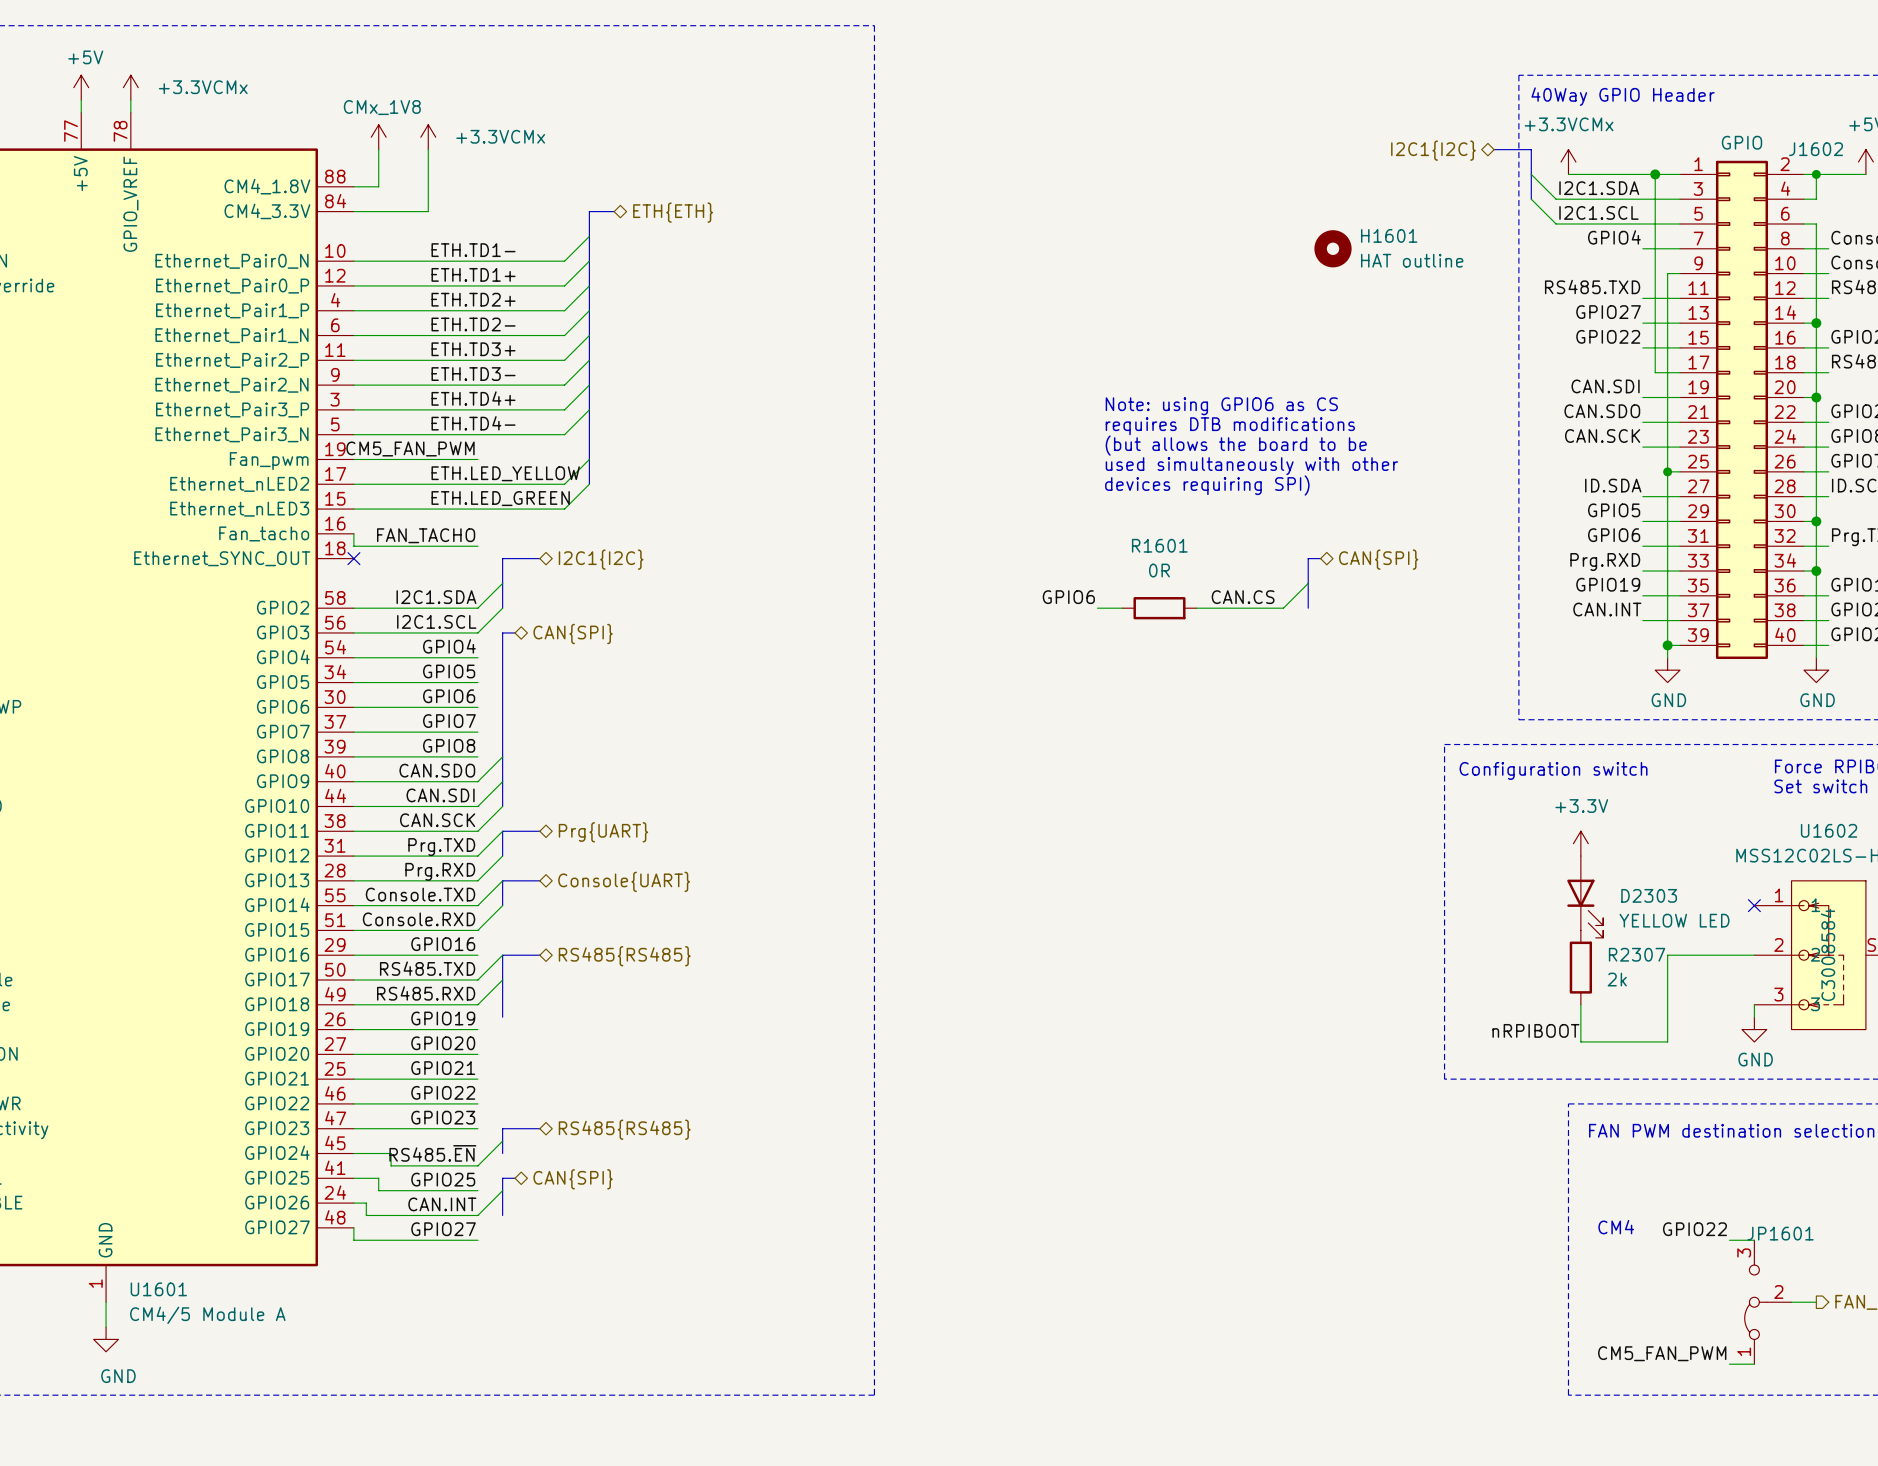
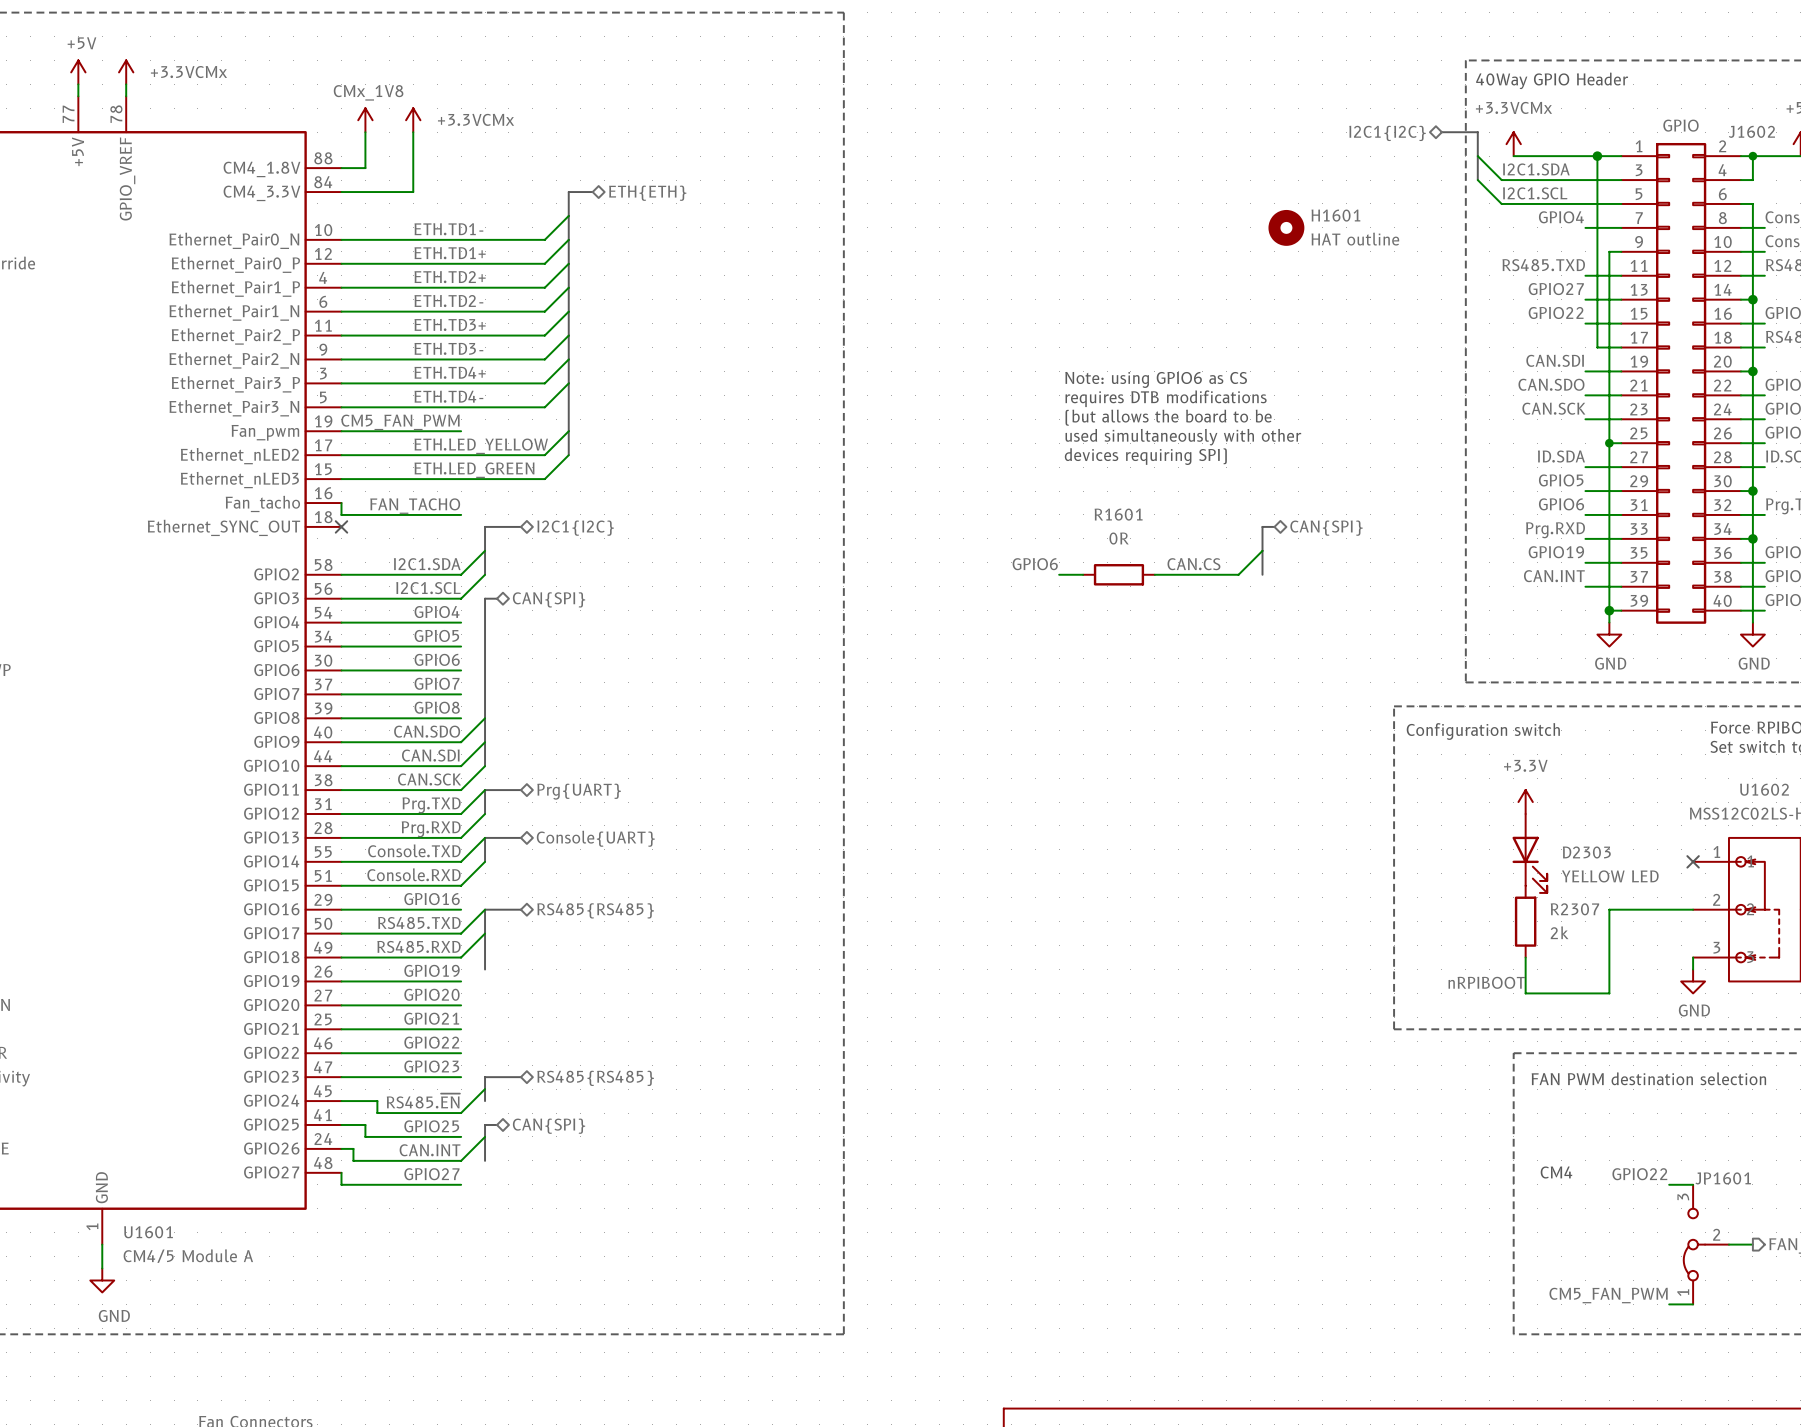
U1602 text: C3008584 (1827, 954) -> none

